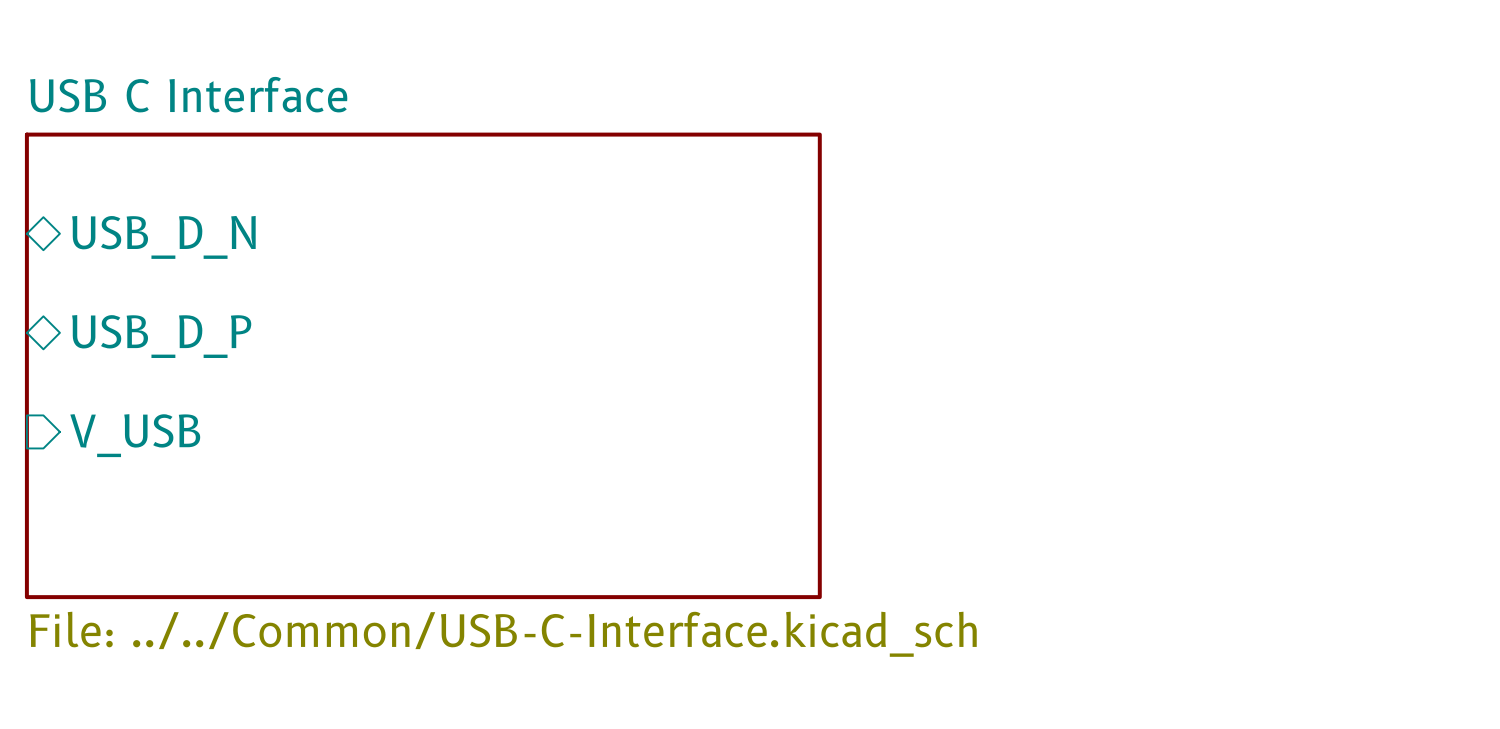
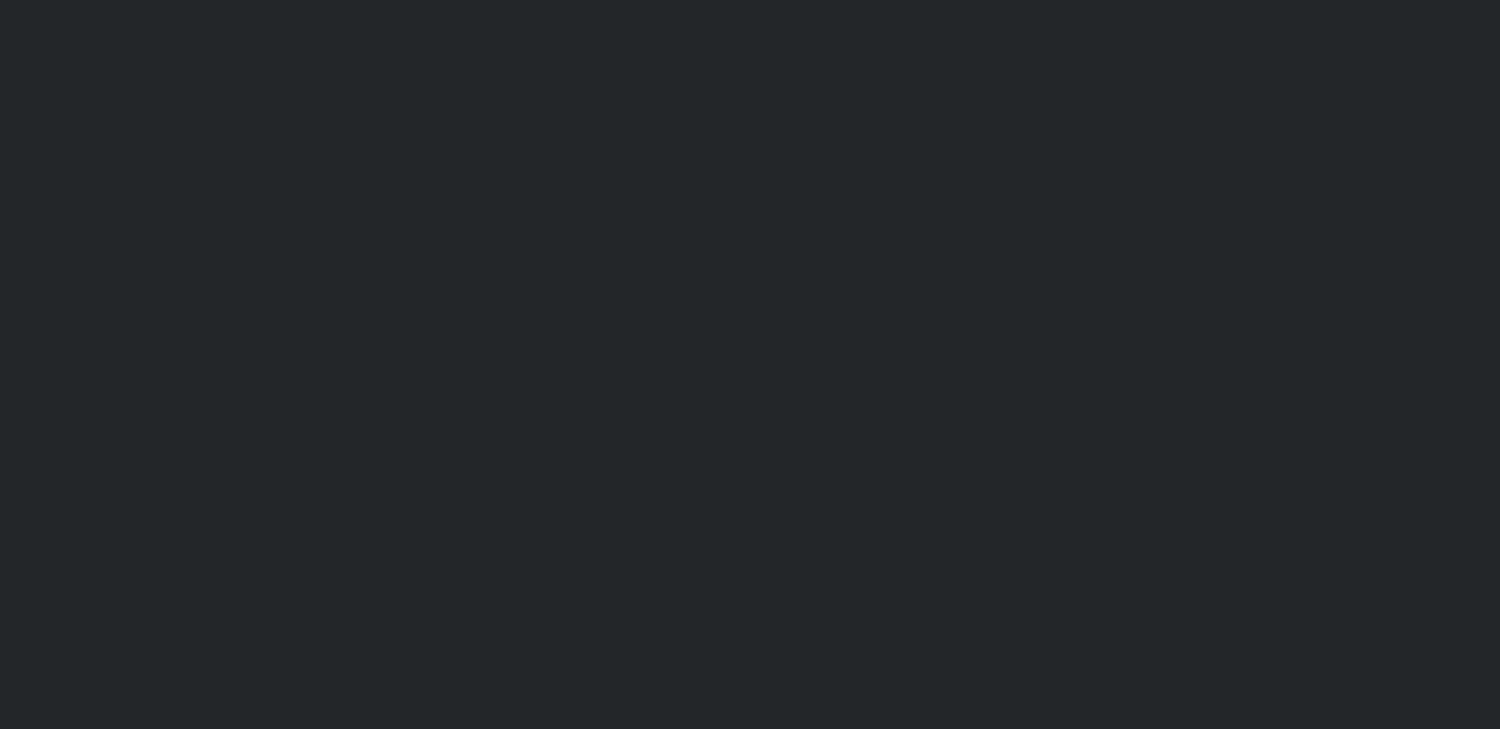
sheet pin: USB_D_N (163, 237) -> none
sheet pin: USB_D_P (161, 336) -> none
sheet USB C Interface: File: ../../Common/USB-C-Interface.kicad_sch (423, 365) -> none
sheet pin: V_USB (135, 435) -> none

